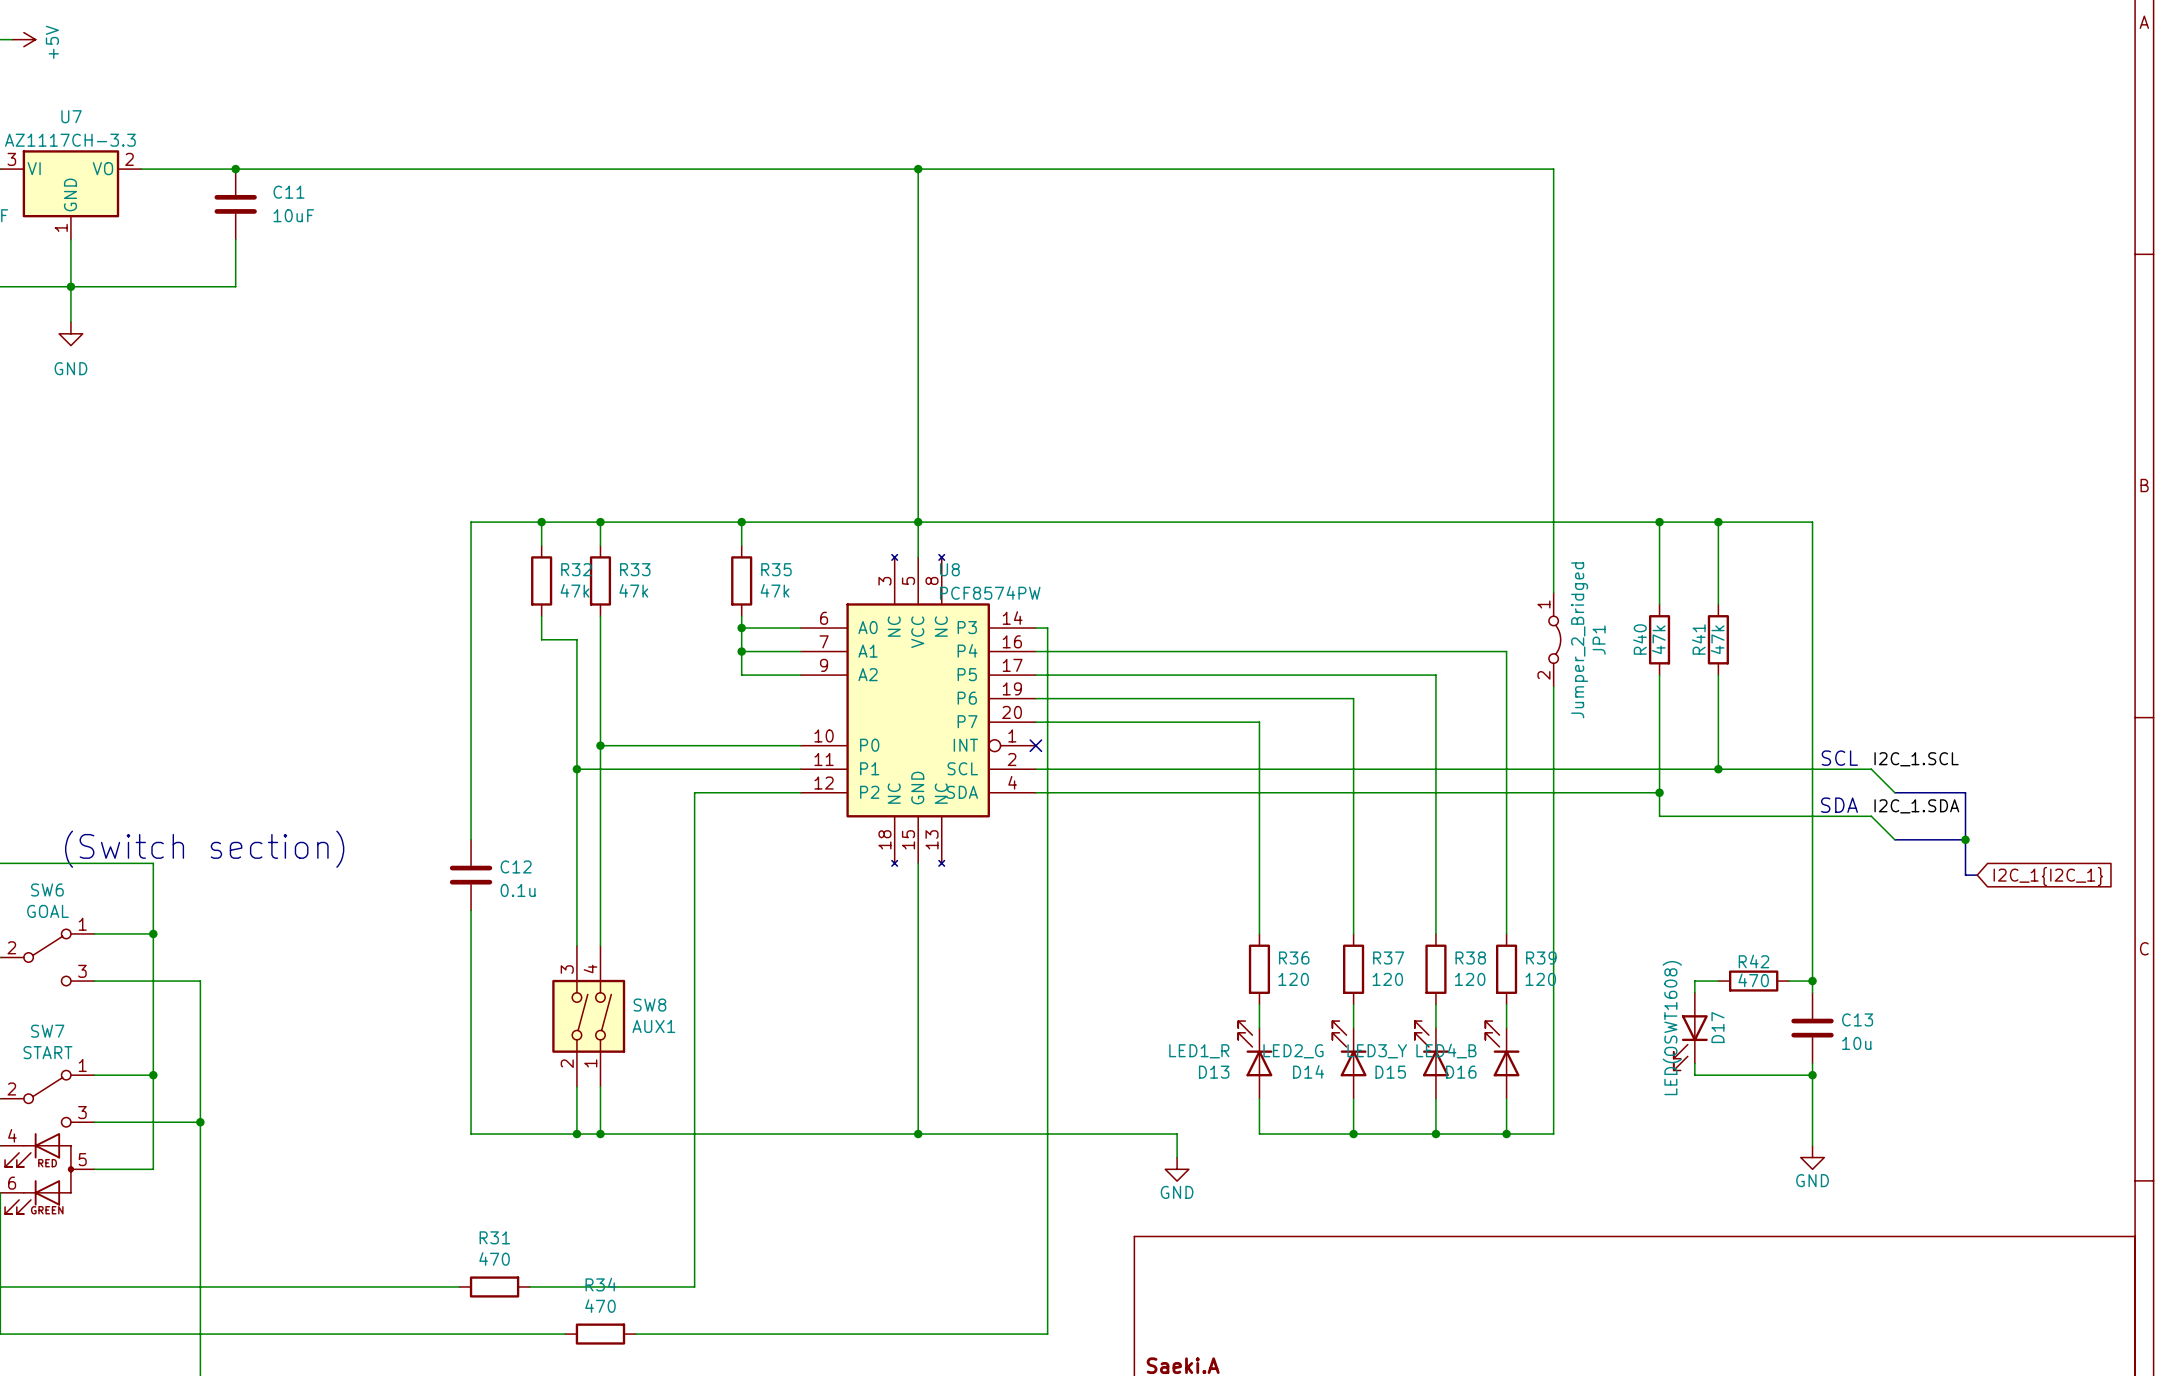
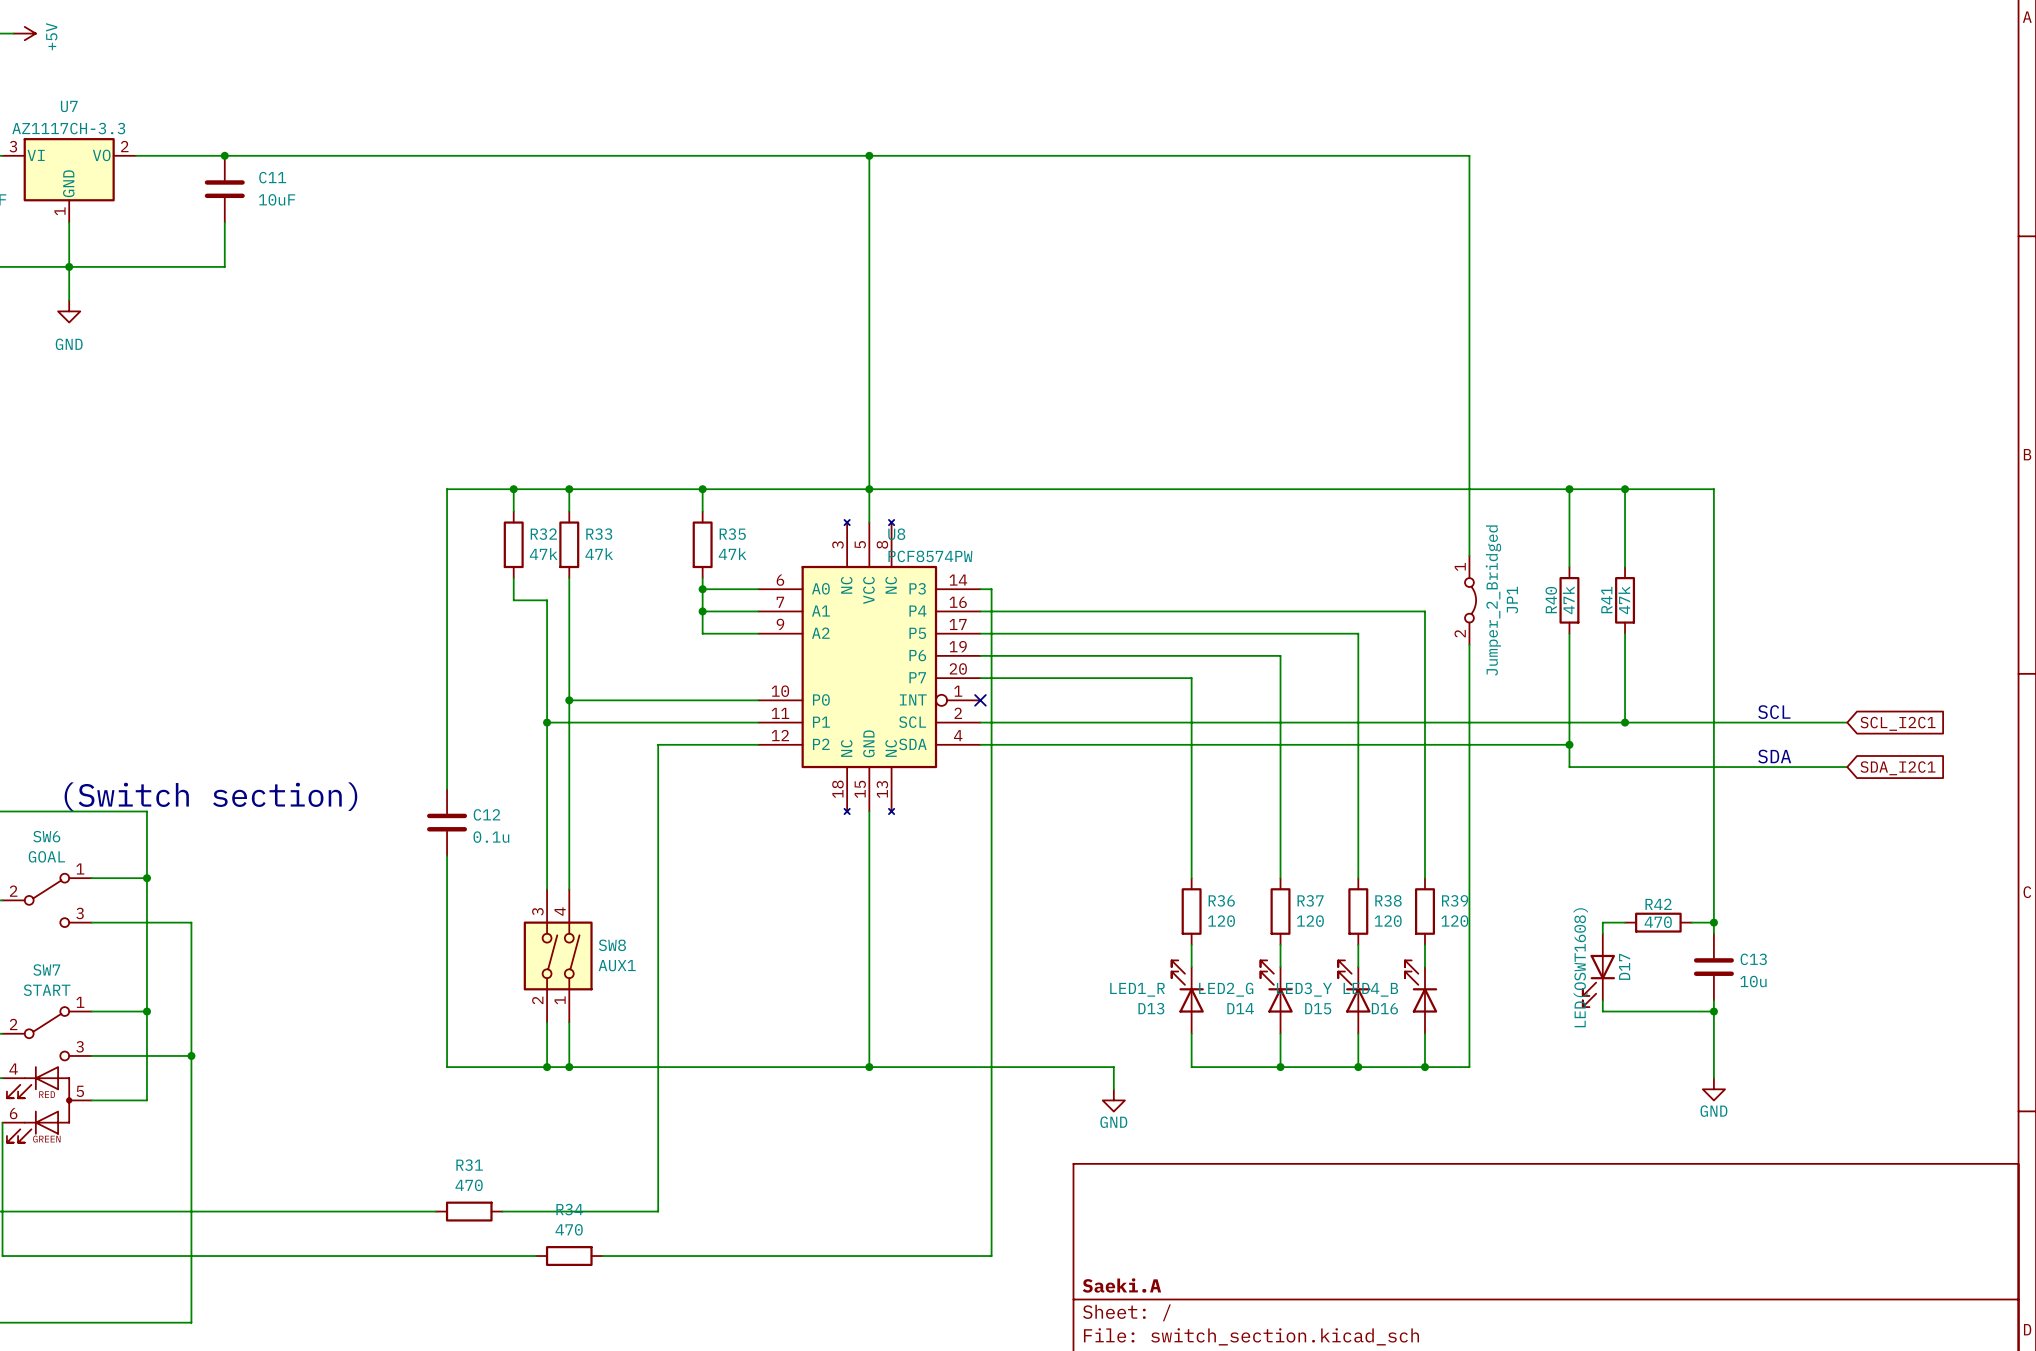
text position: SCL (1839, 758) -> SCL (1774, 712)
label: I2C_1.SCL (1916, 759) -> none
wire: (1871, 769) (1894, 792) -> (1769, 722) (1847, 722)
global label: none -> SCL_I2C1 (1897, 723)
bus: (1894, 792) (1965, 792) (1965, 875) (1977, 875) -> none
text position: SDA (1839, 805) -> SDA (1774, 756)
label: I2C_1.SDA (1916, 806) -> none
wire: (1871, 816) (1894, 839) -> (1769, 767) (1847, 767)
global label: none -> SDA_I2C1 (1897, 768)
bus: (1894, 839) (1965, 839) -> none
junction: (1965, 839) -> none
global label: I2C_1{I2C_1} (2048, 876) -> none

